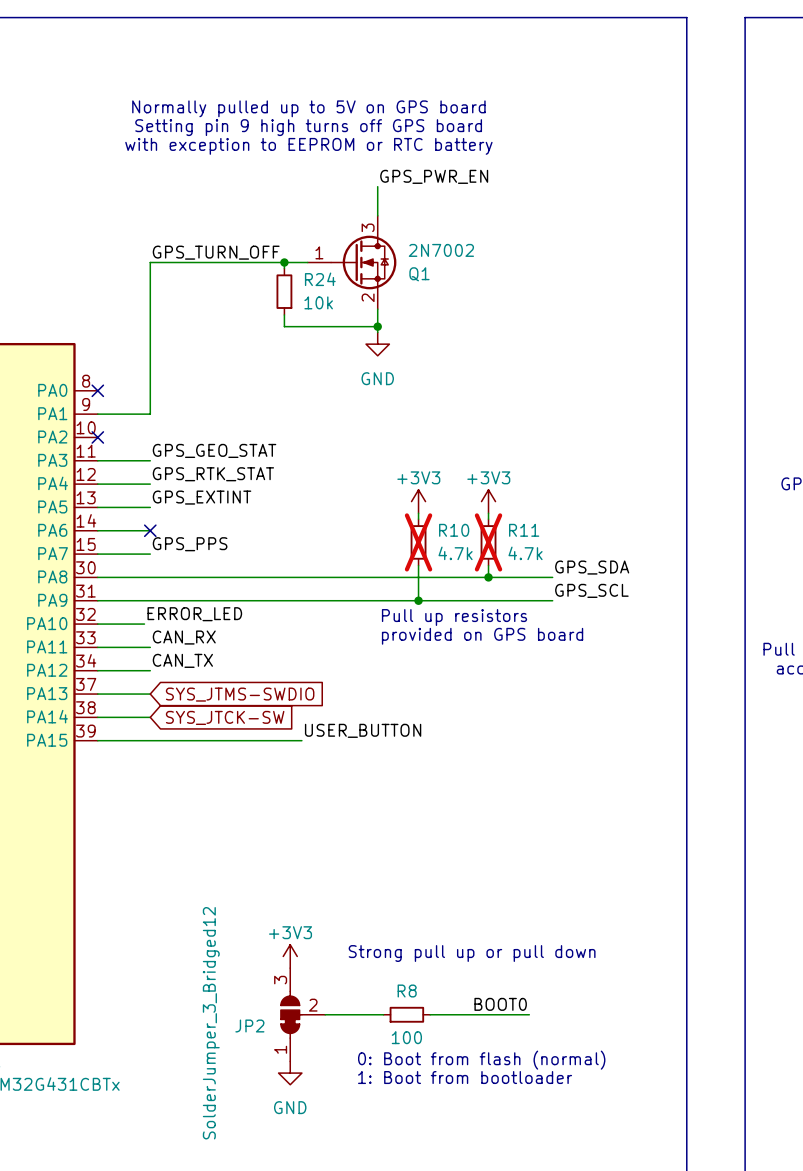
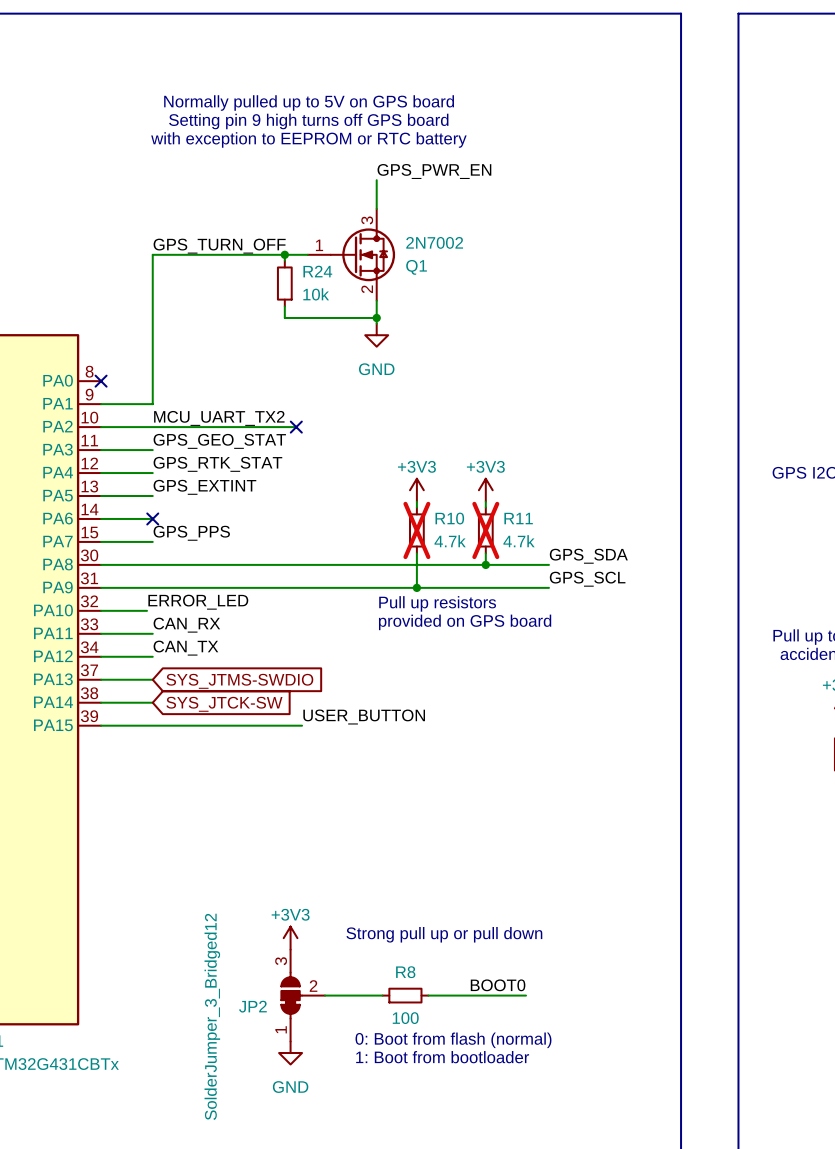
label: none -> MCU_UART_TX2 (219, 418)
wire: none -> (101, 427) (296, 427)
no-connect mark: (97, 437) -> none
no-connect mark: none -> (296, 427)

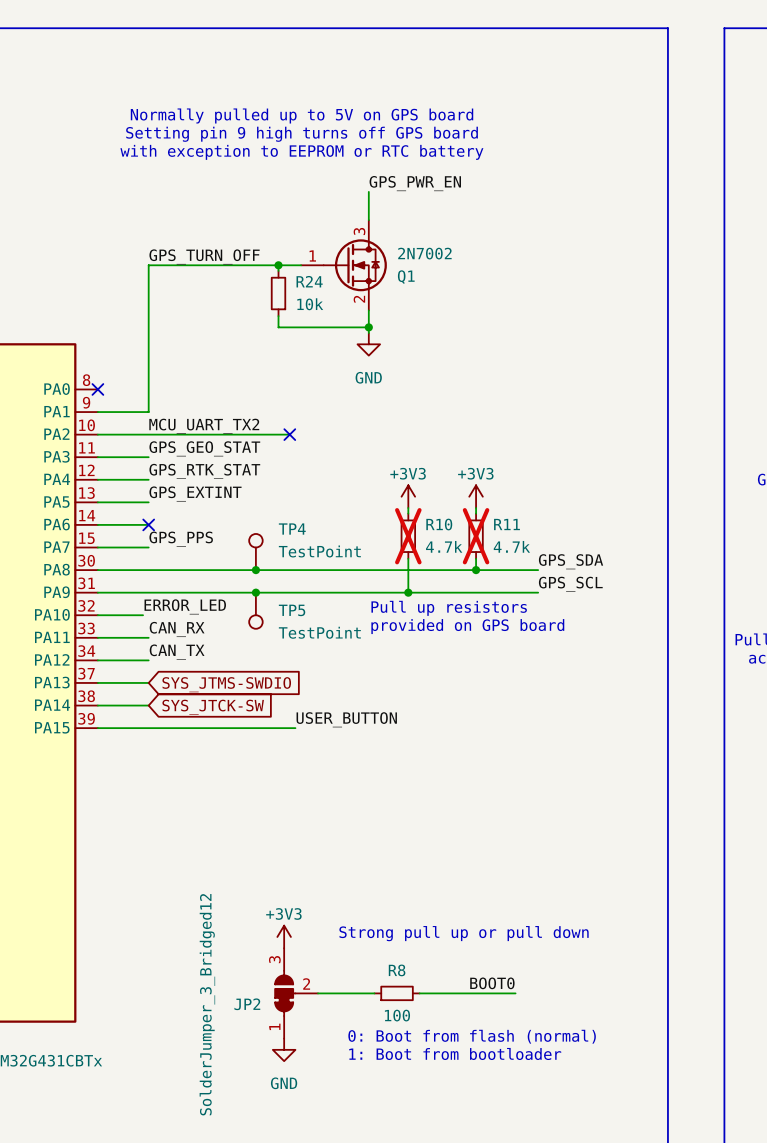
TP4: none -> TestPoint (255, 552)
junction: none -> (255, 570)
junction: none -> (255, 592)
TP5: none -> TestPoint (255, 610)

